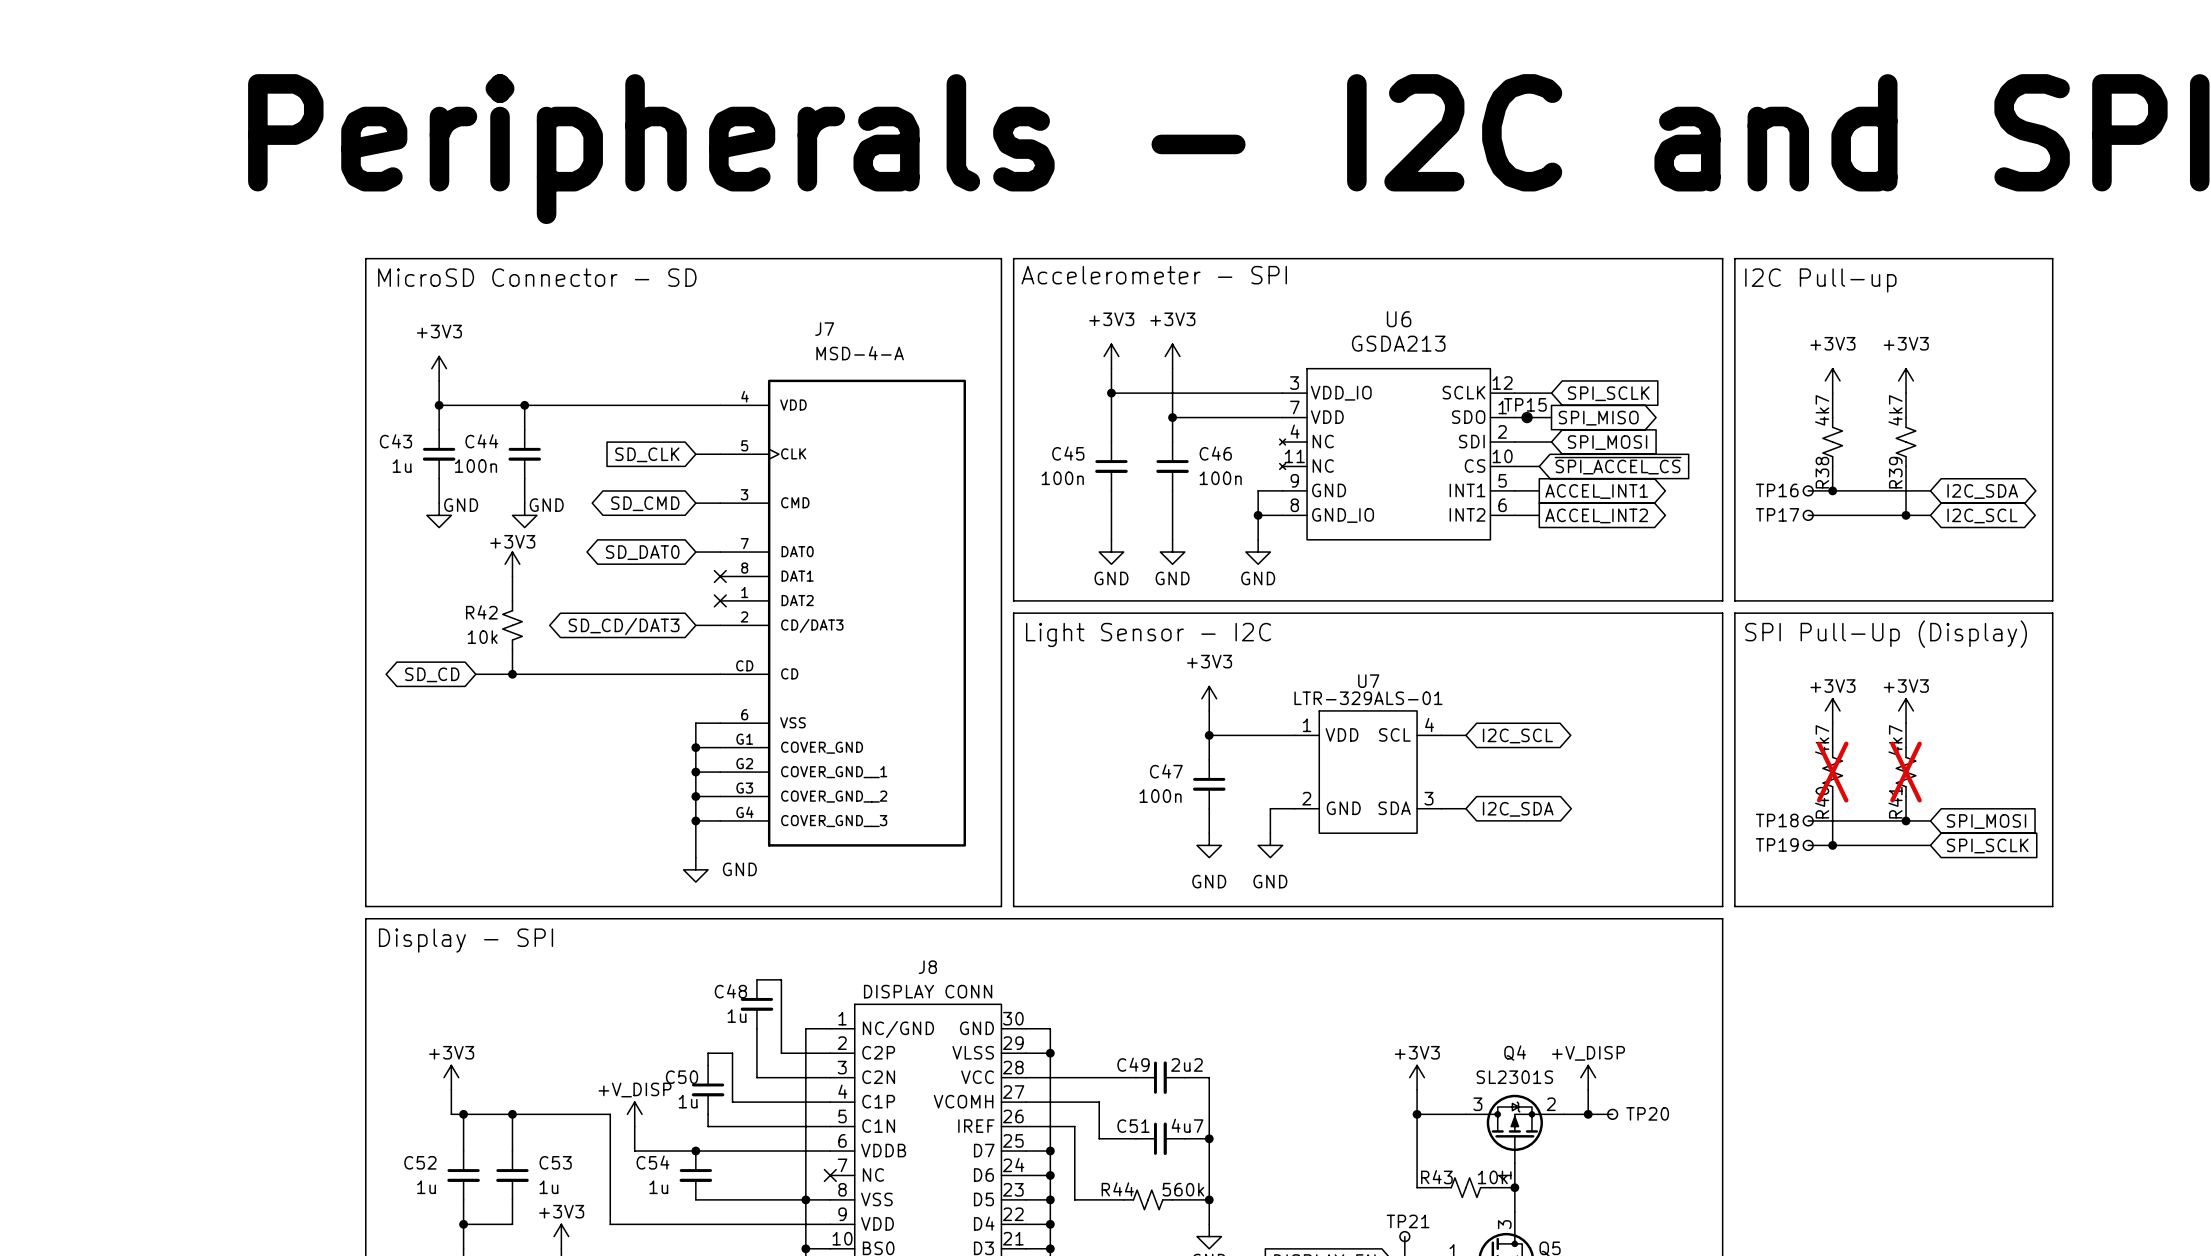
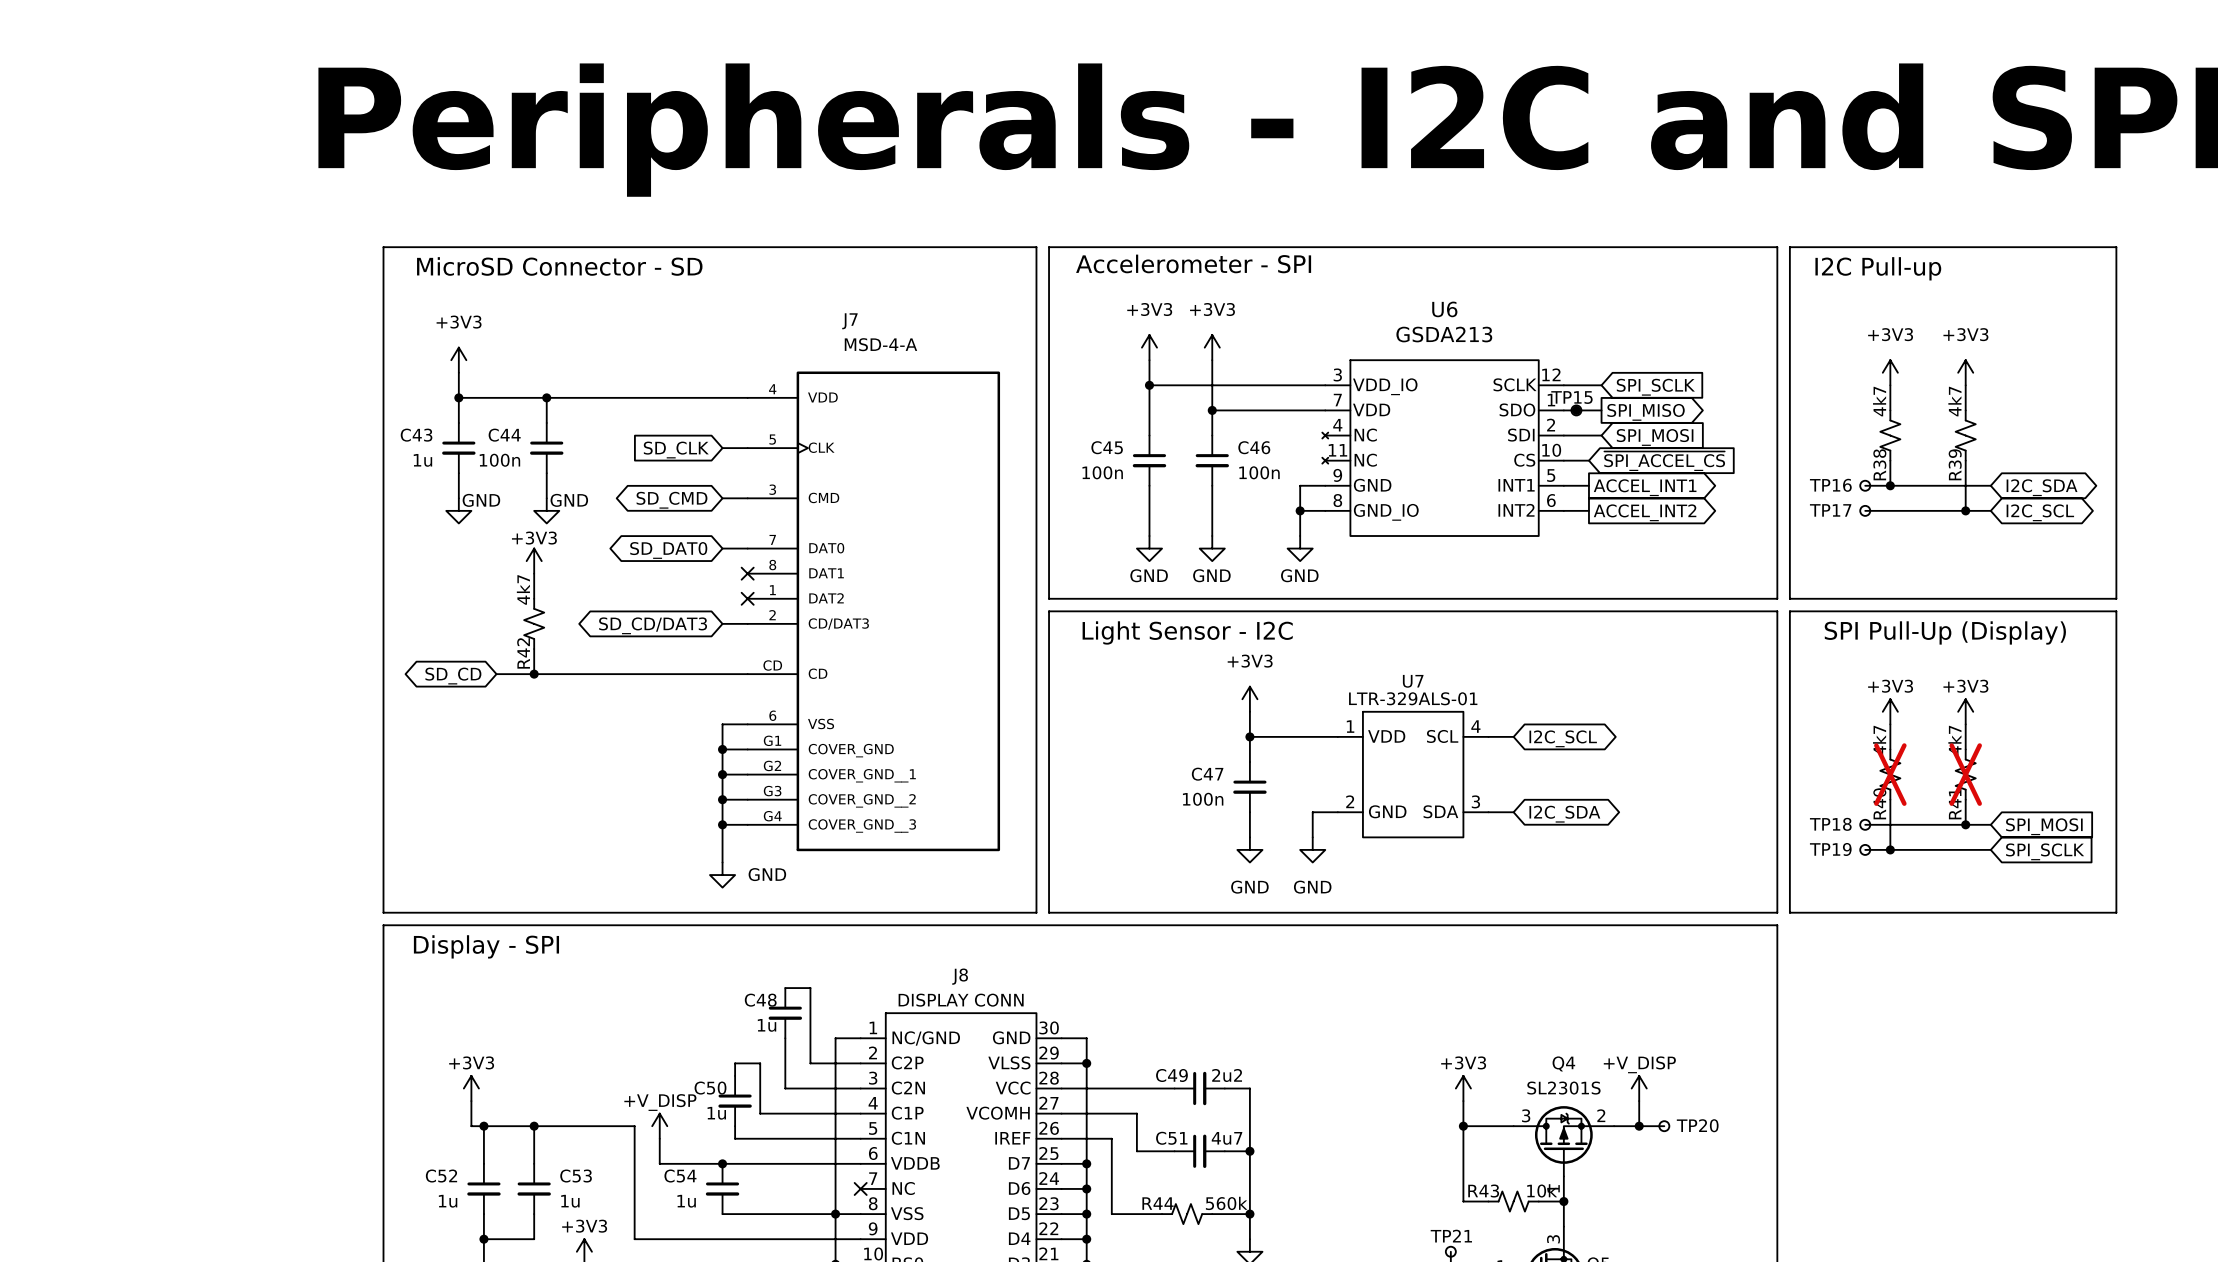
R42 name position: R42 (481, 612) -> R42 (523, 653)
R42 flip: as is (512, 625) -> left-right (534, 623)
R42 value: 10k (482, 637) -> 4k7 (523, 589)

